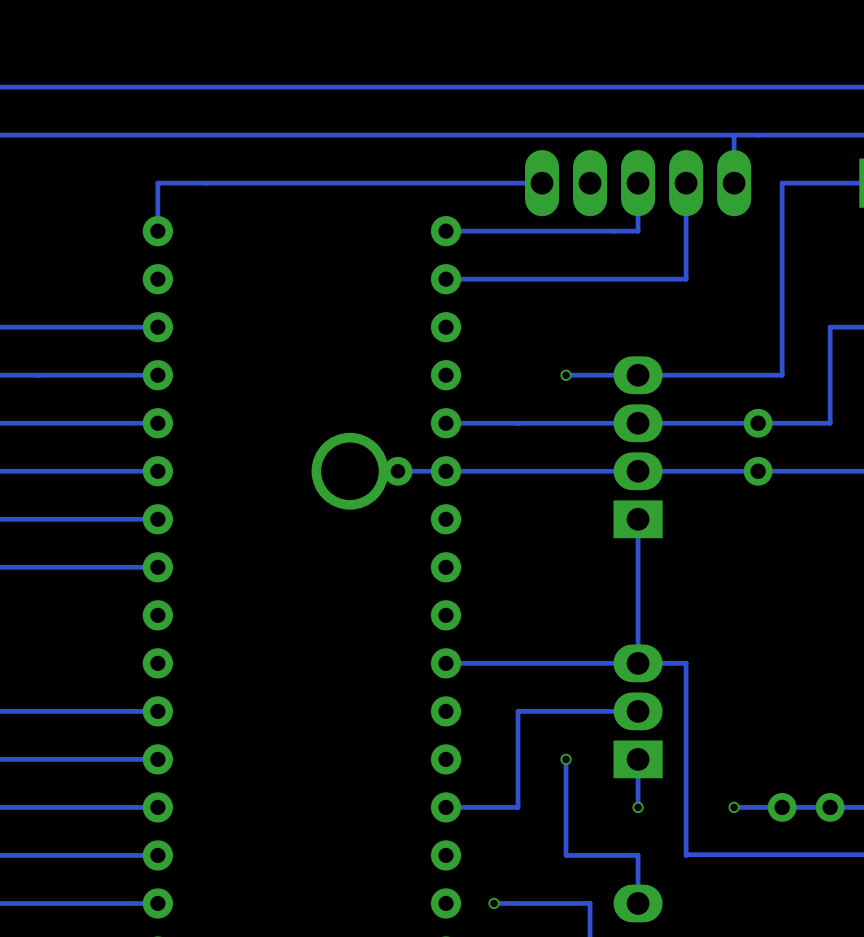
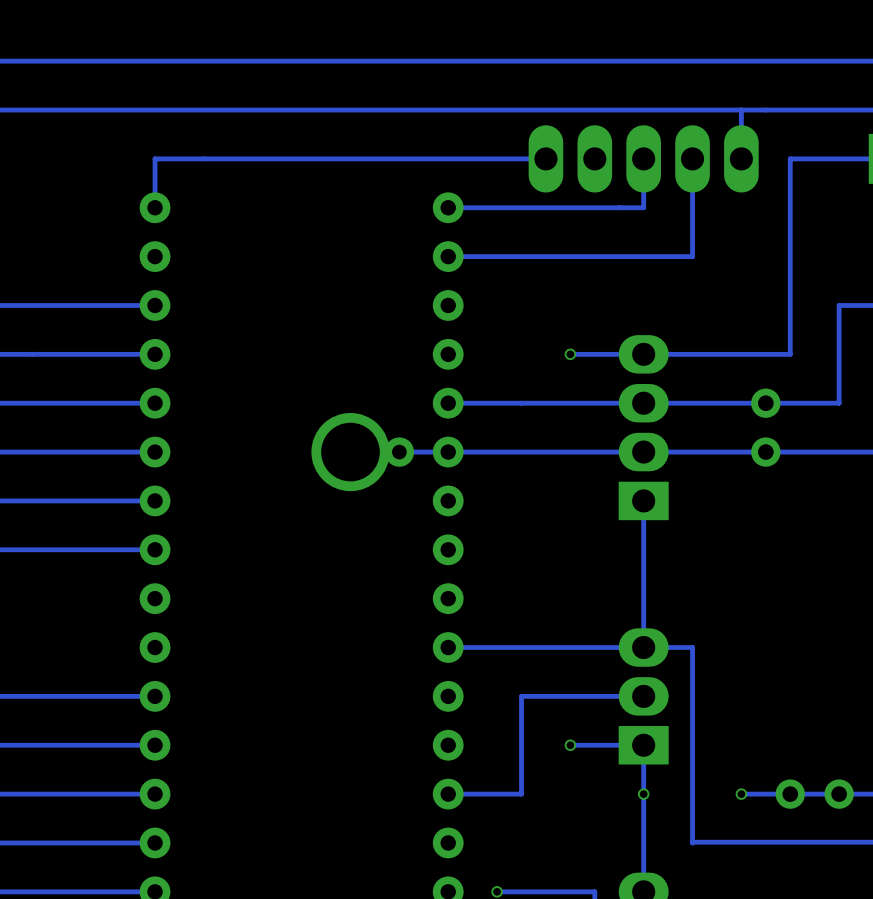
track: (566, 759) (566, 855) (638, 855) -> (643, 794) (643, 842)
track: none -> (643, 745) (570, 745)

